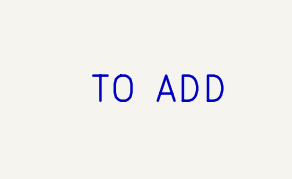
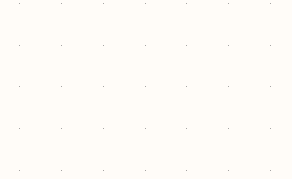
text: TO ADD (157, 88) -> none

